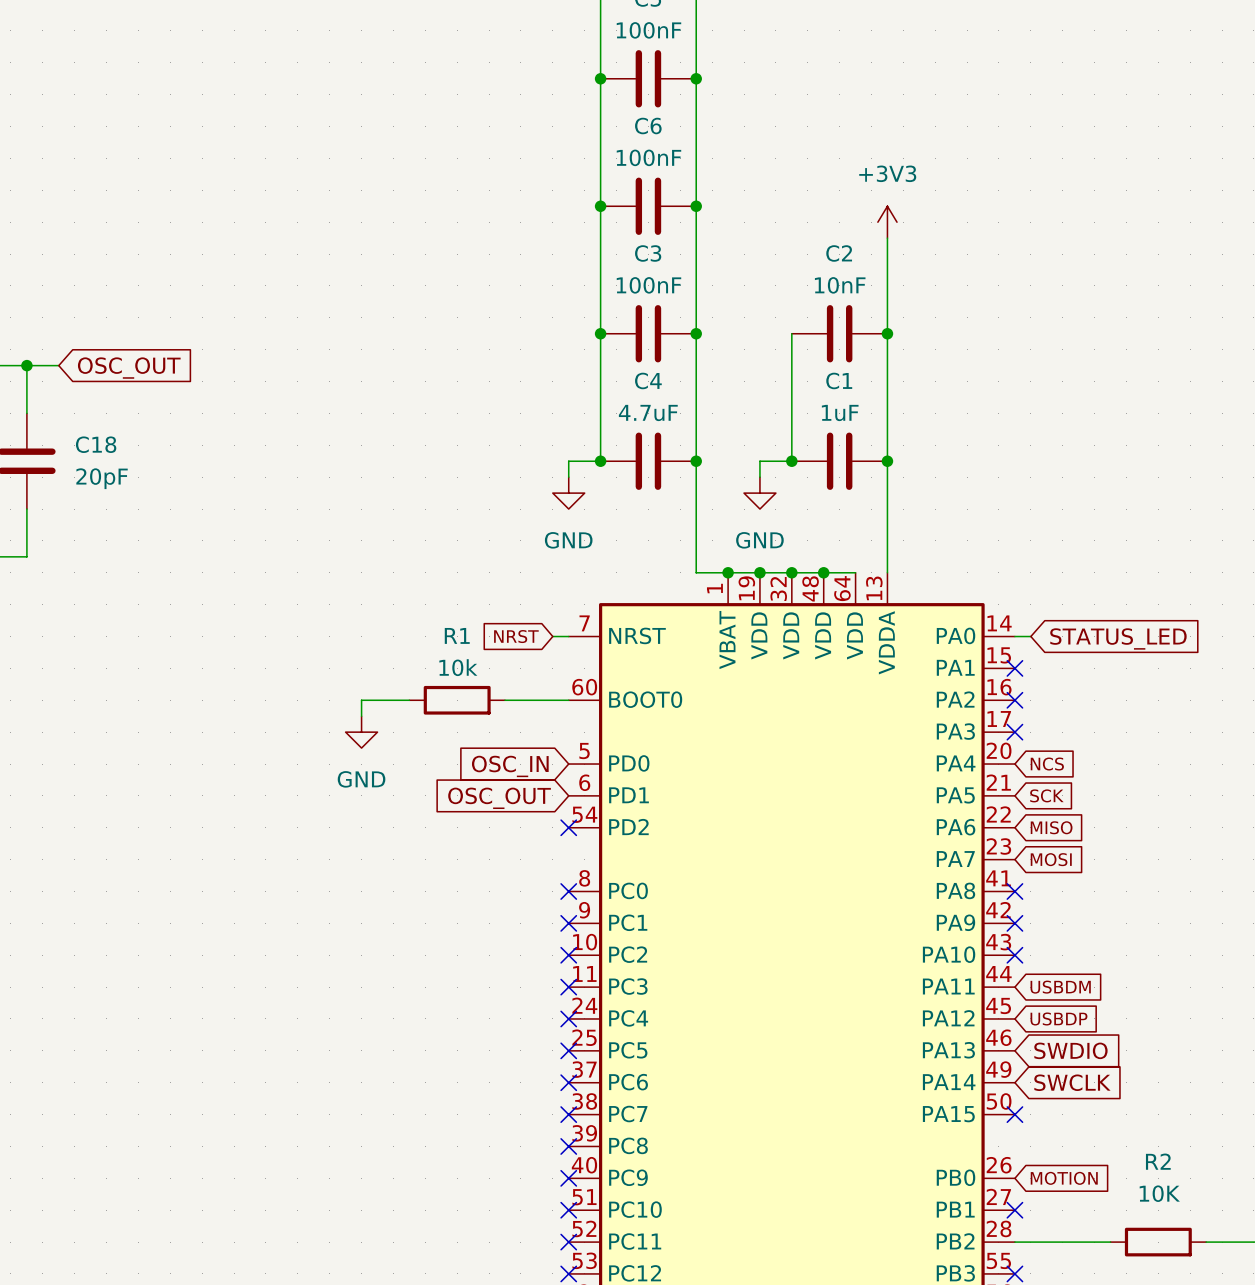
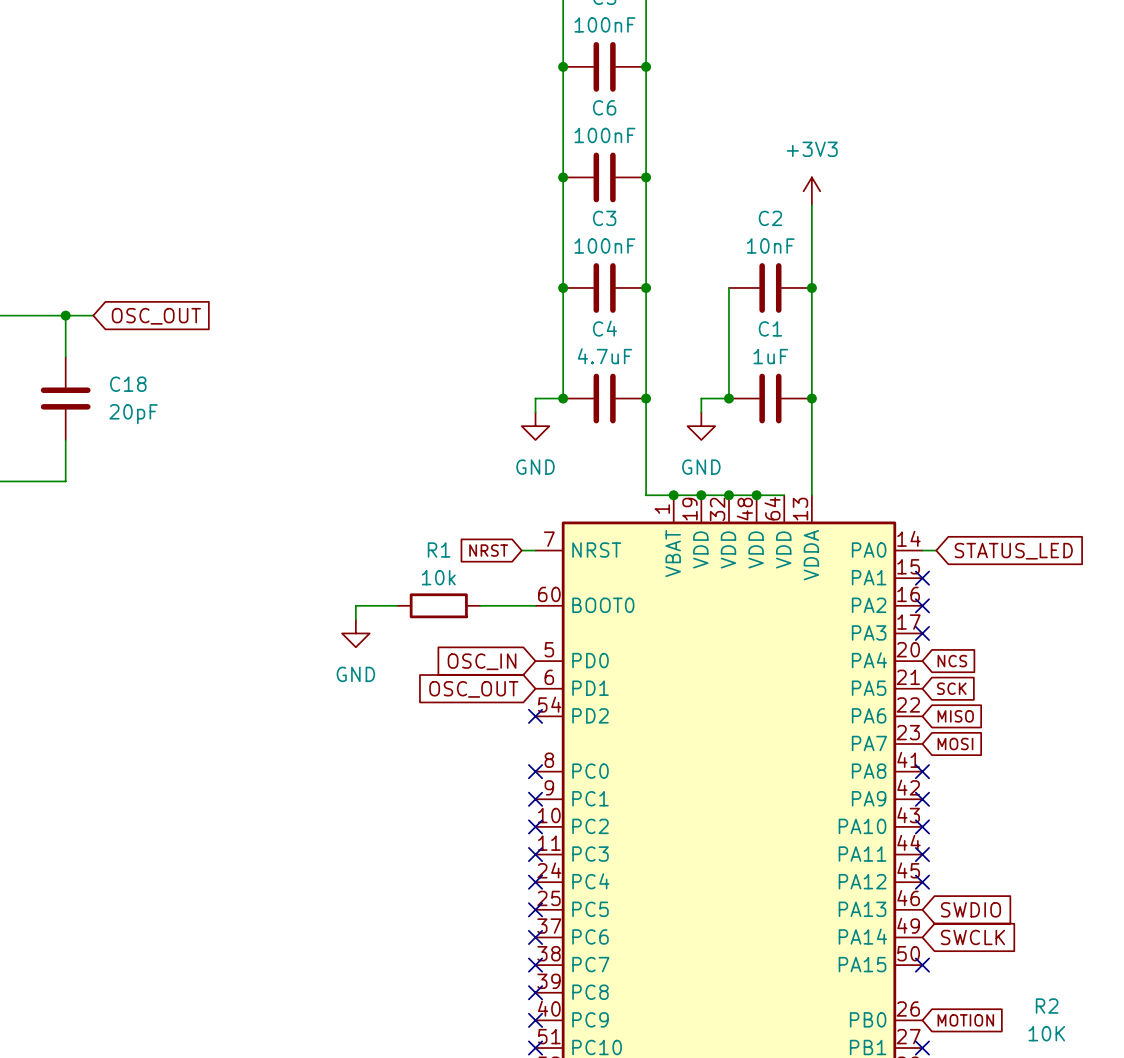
no-connect mark: none -> (922, 854)
global label: USBDM (1060, 987) -> none
no-connect mark: none -> (922, 882)
global label: USBDP (1058, 1018) -> none

